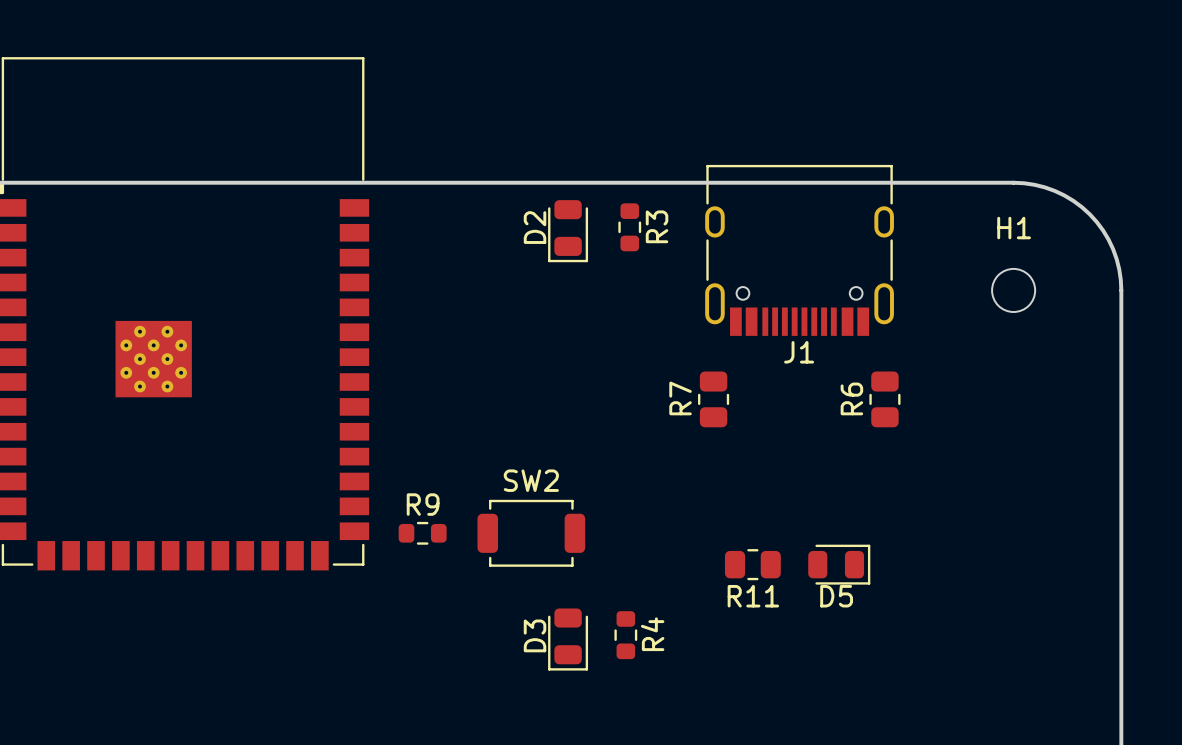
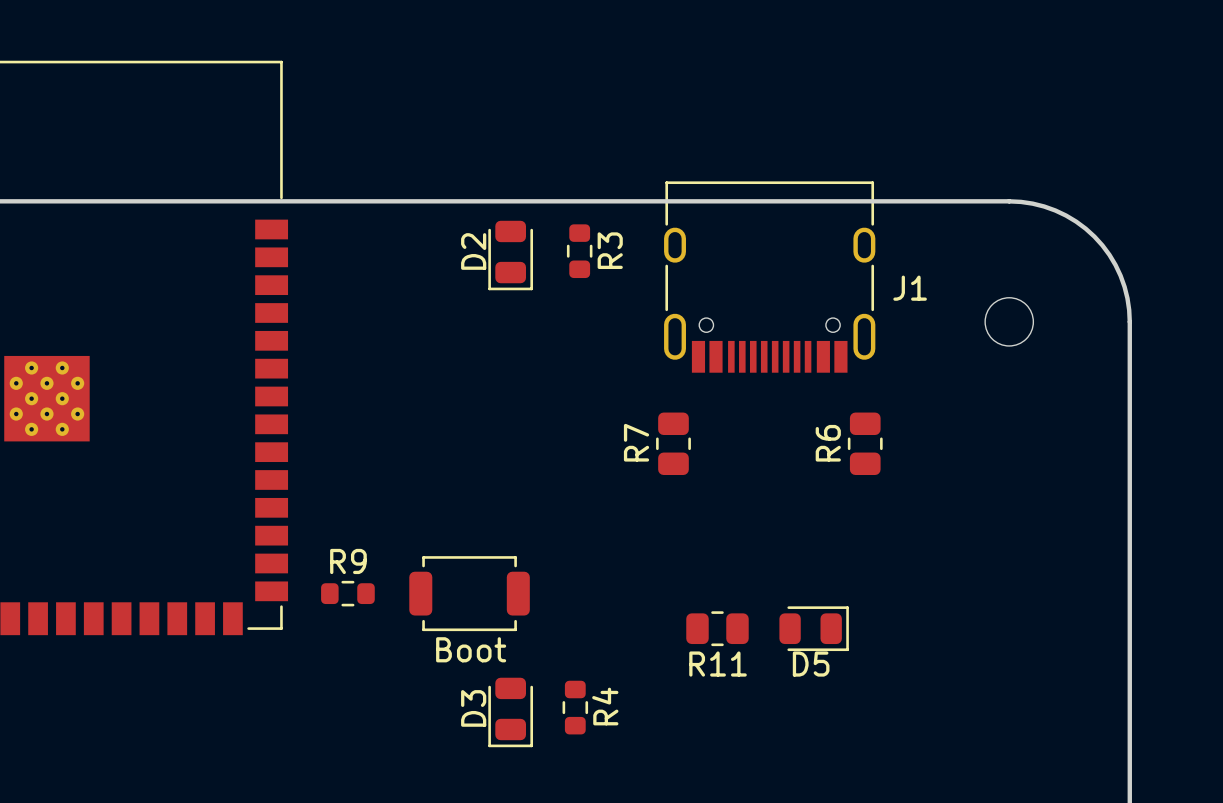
H1 name: H1 (1014, 228) -> none
J1 name position: J1 (799, 352) -> J1 (910, 288)
SW2 name: SW2 (531, 480) -> Boot (471, 649)

